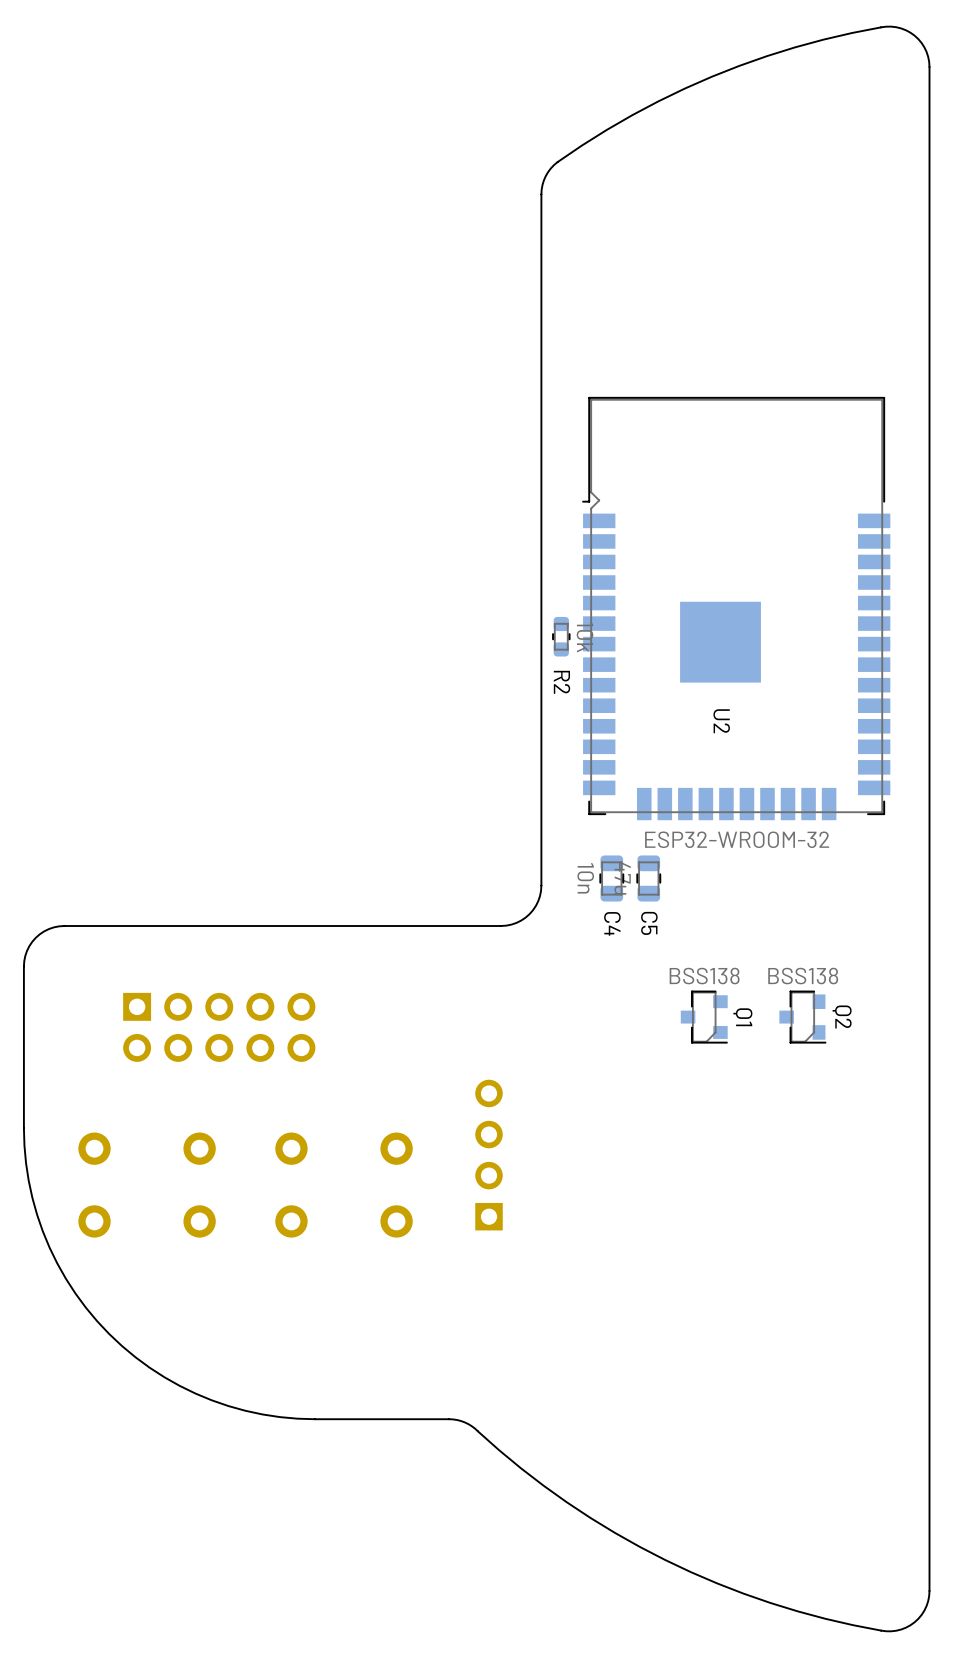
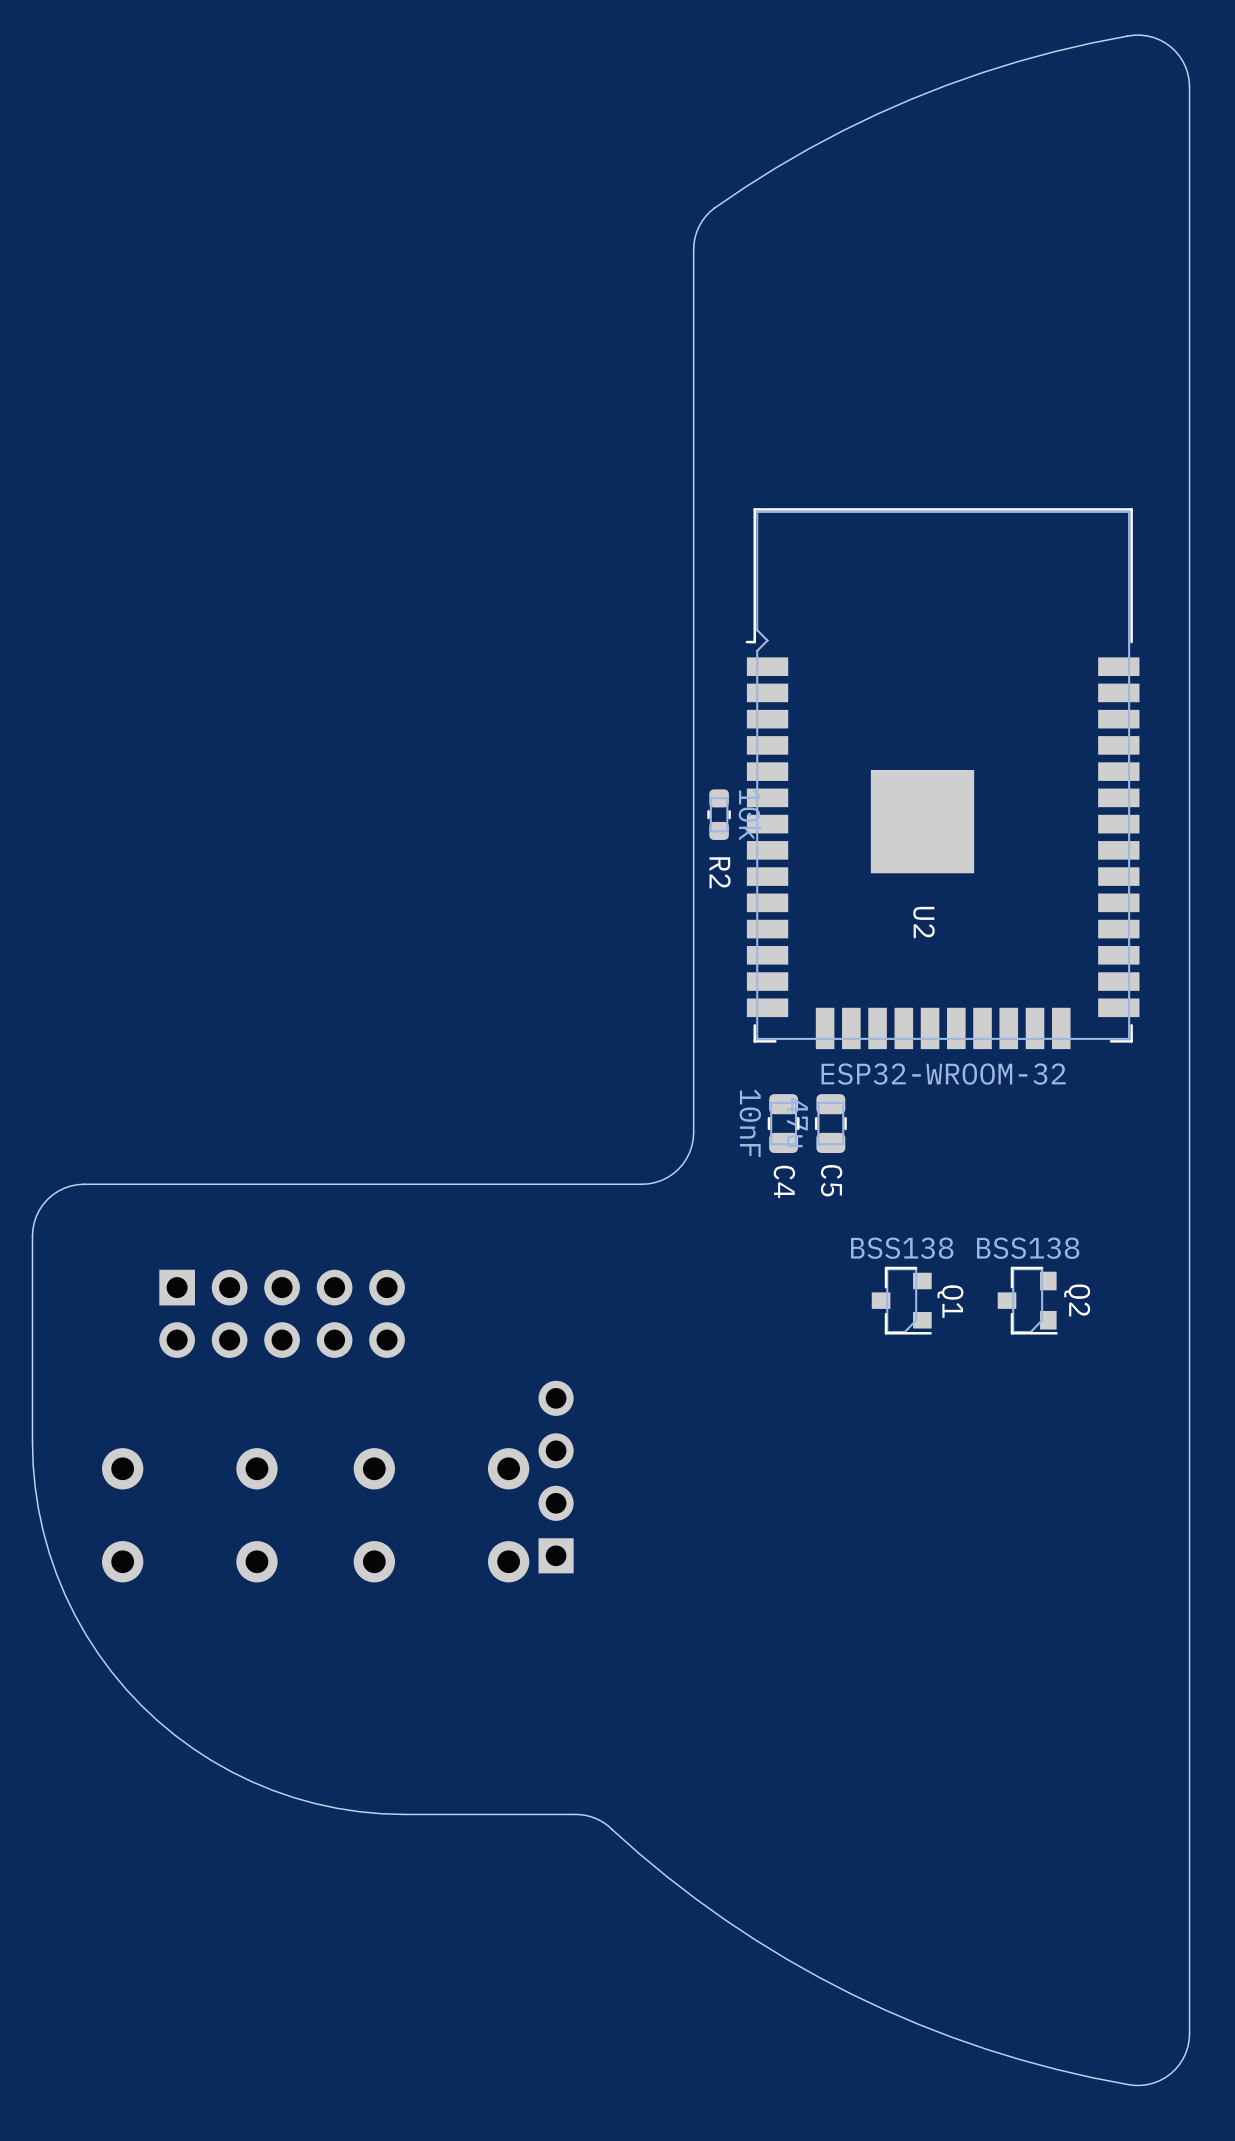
C4 value: 10n (585, 878) -> 10nF (750, 1123)
part position: (489, 1155) -> (556, 1477)

